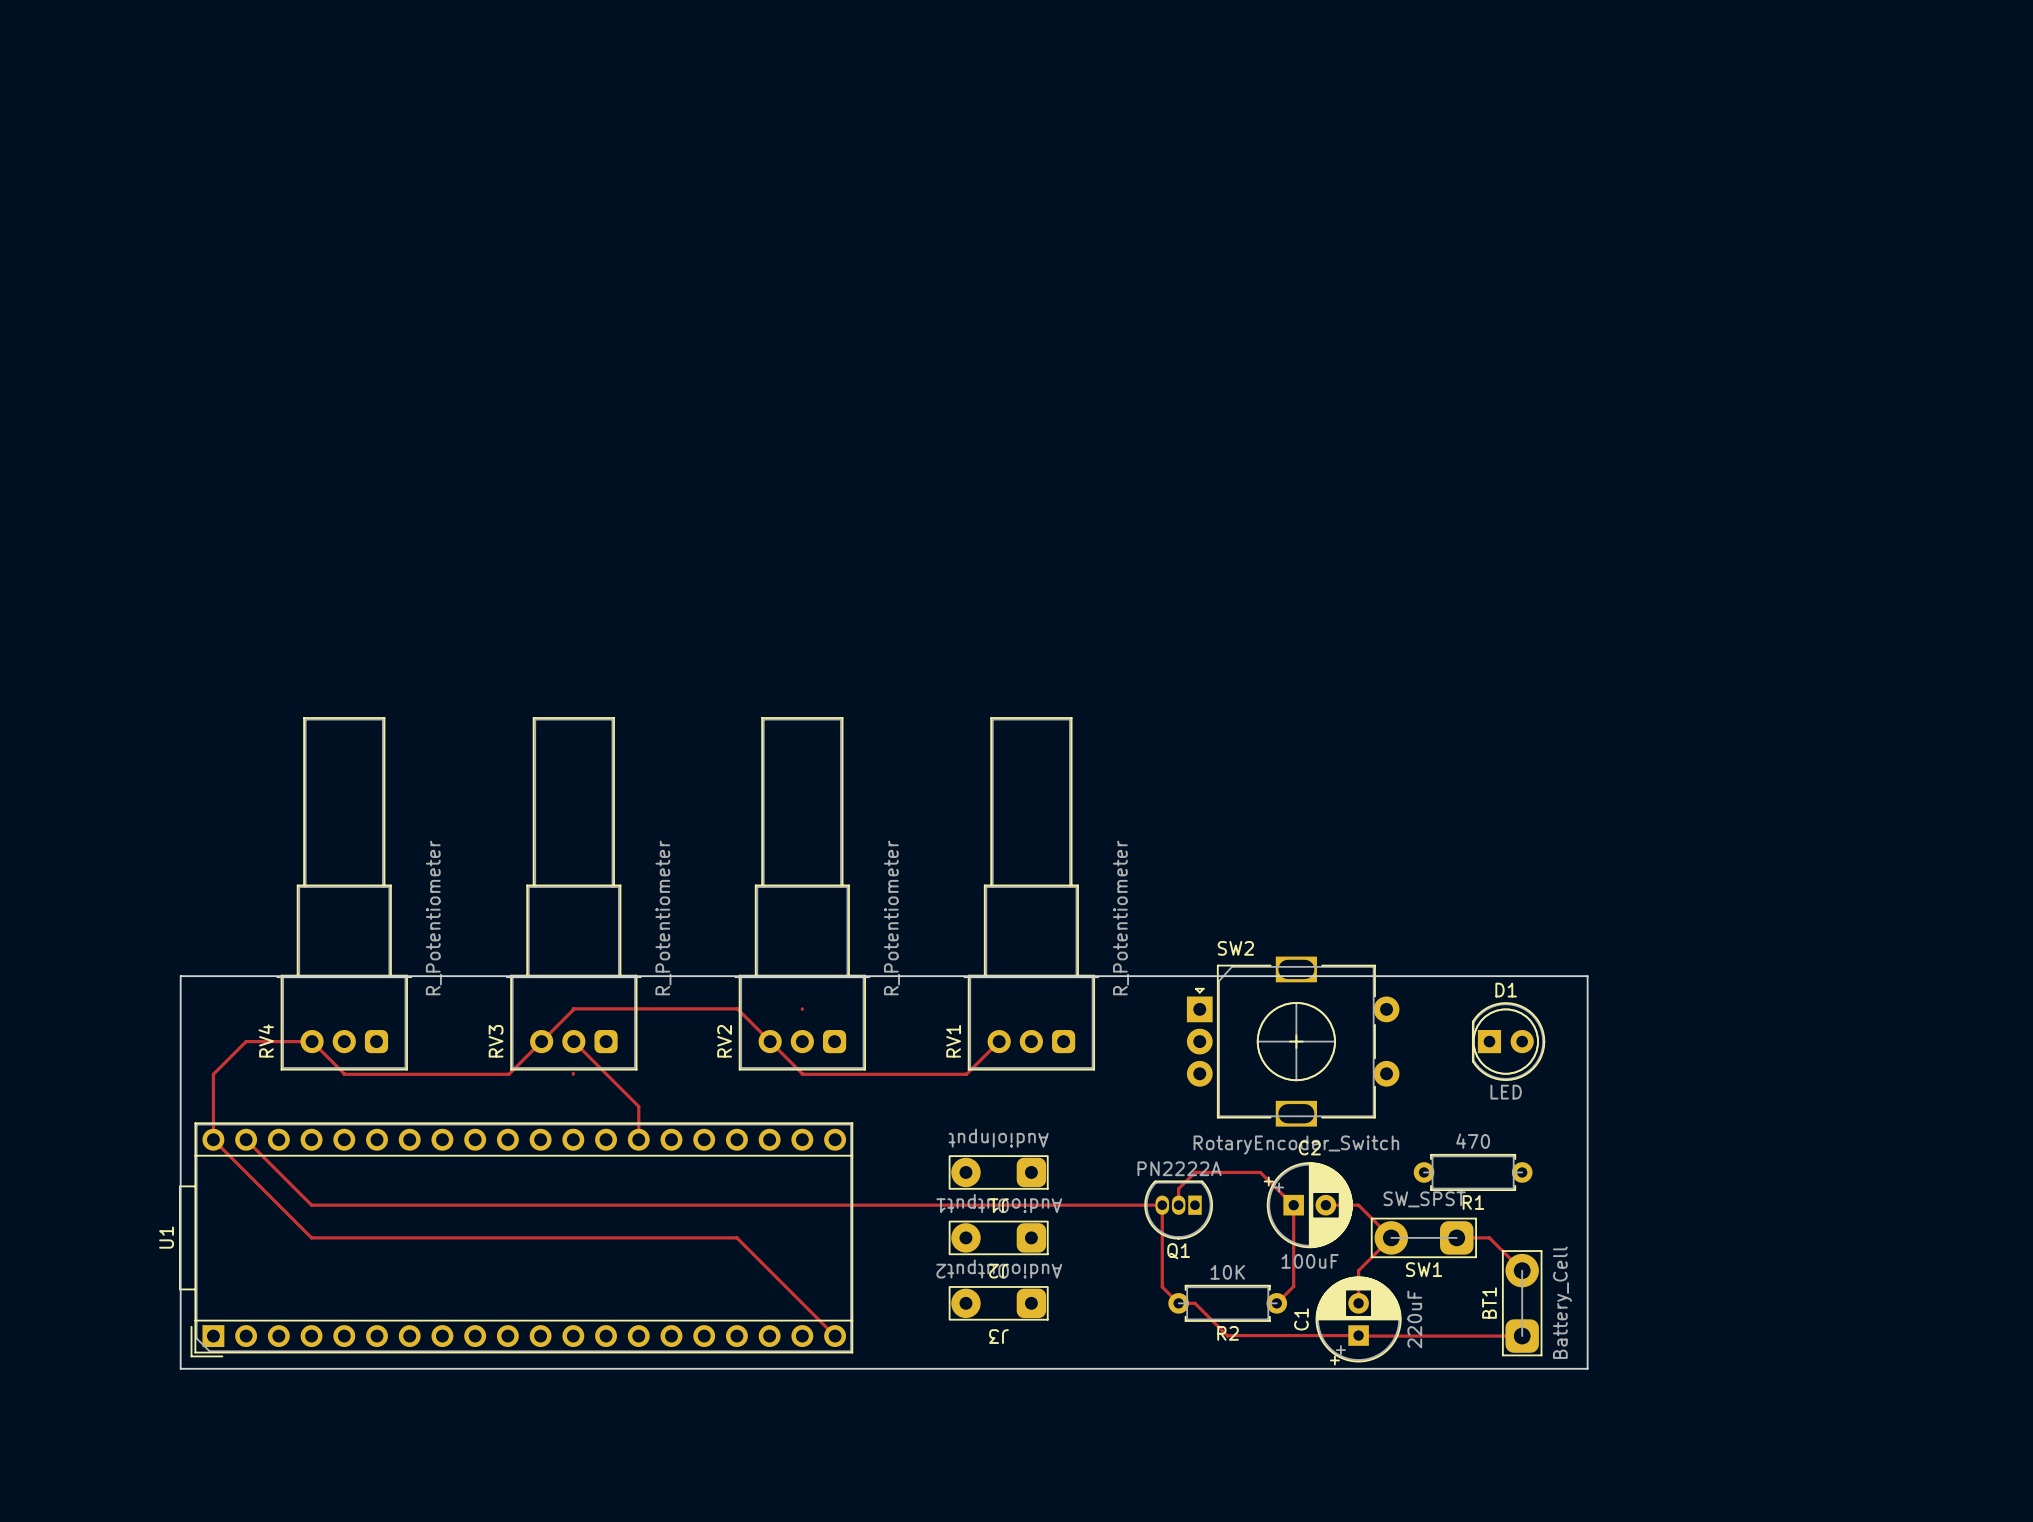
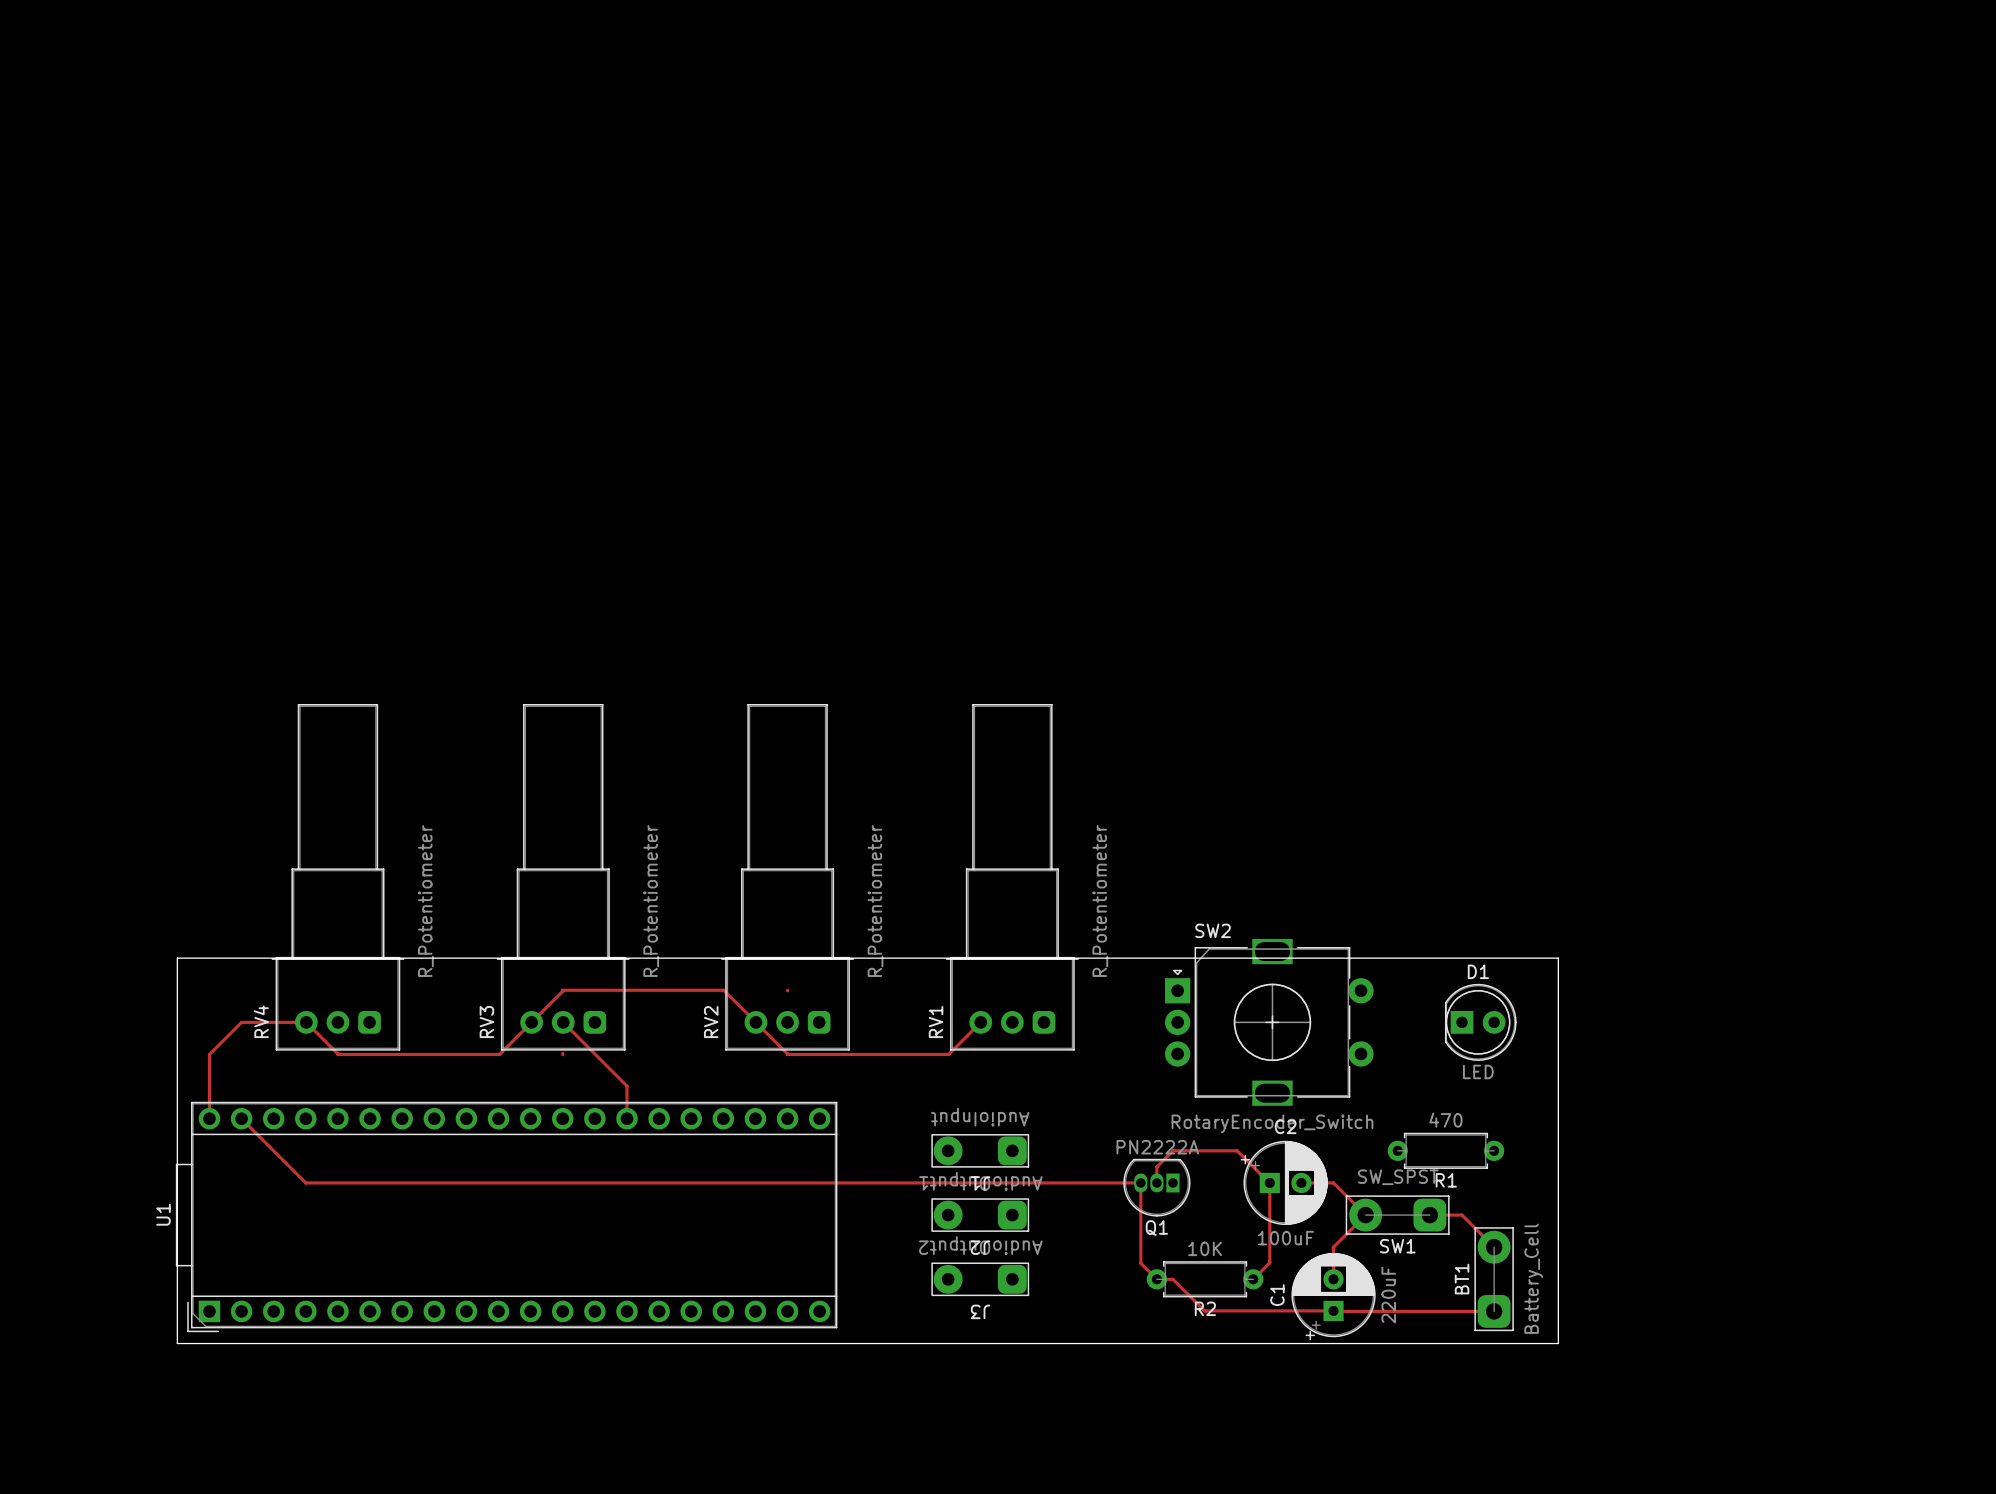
track: (213, 1139) (311, 1237) (736, 1237) (835, 1336) -> none

